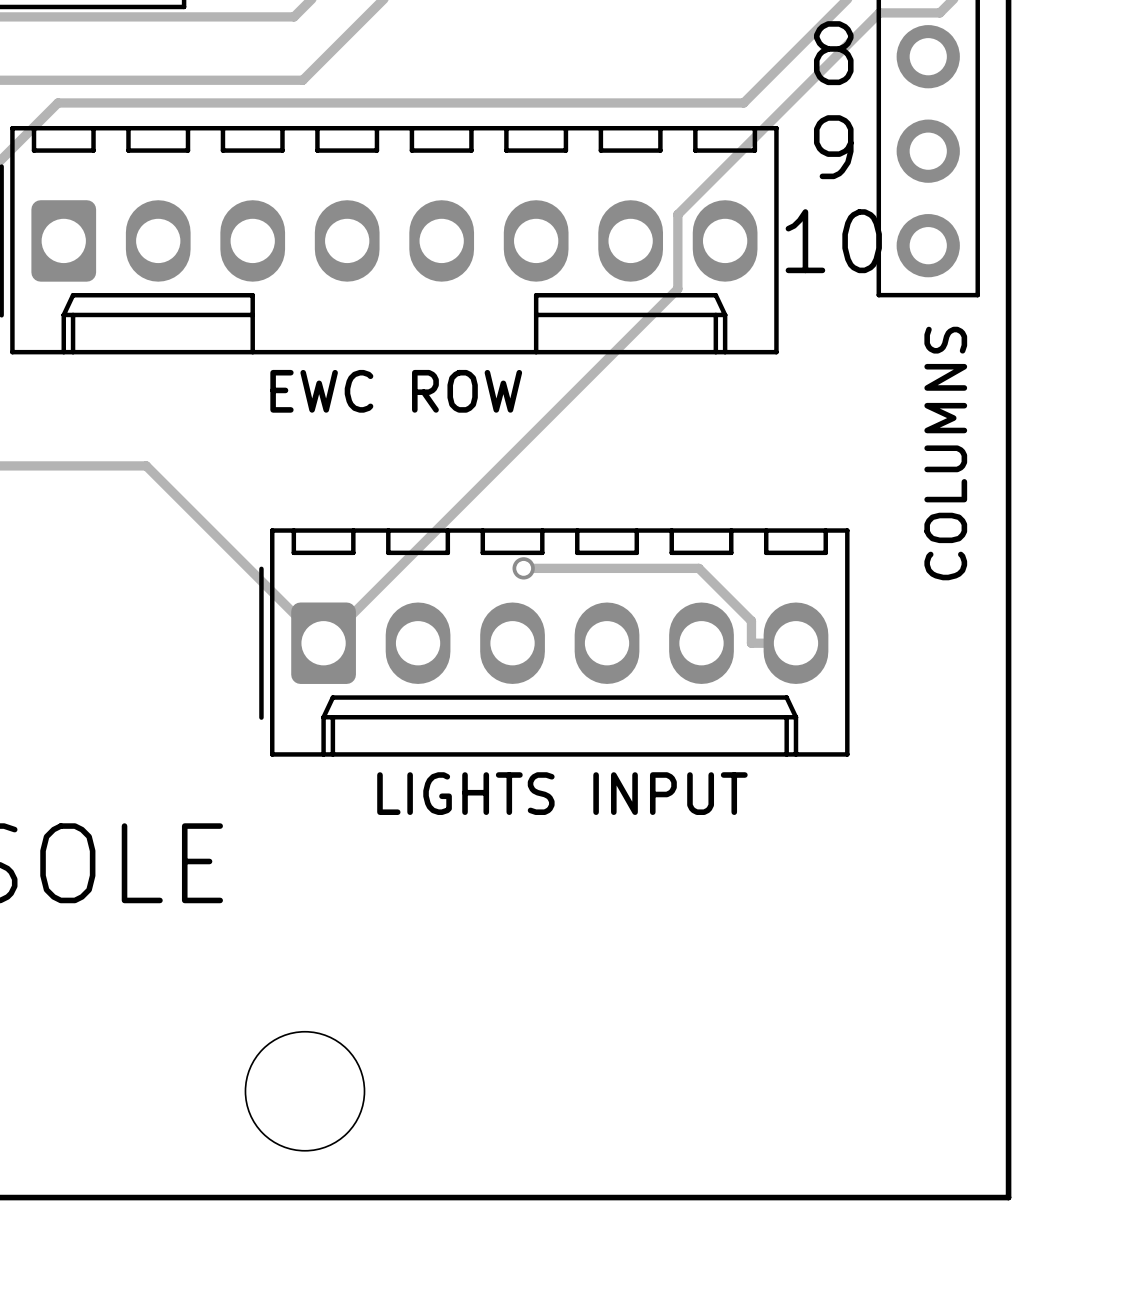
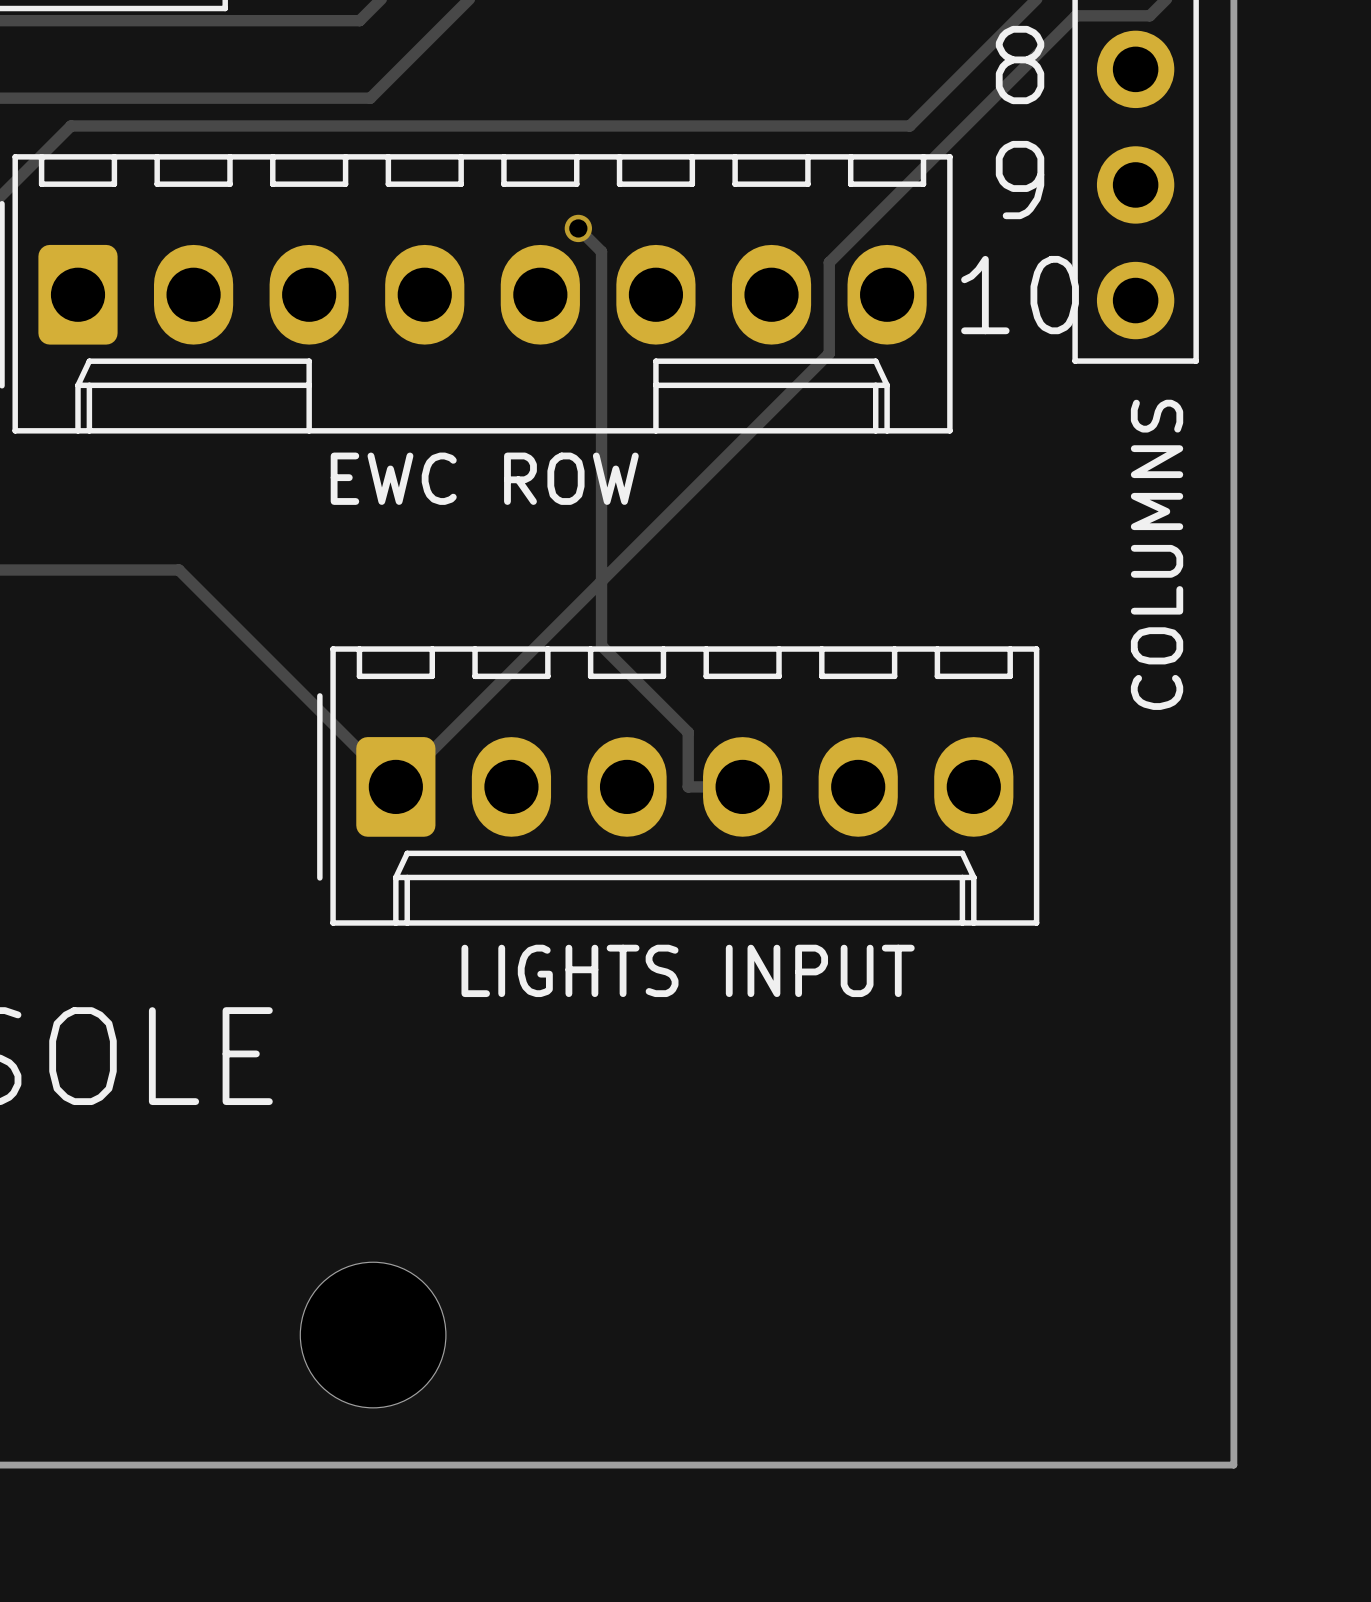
track: none -> (578, 228) (601, 251) (601, 645) (688, 732) (688, 786) (742, 786)
via: none -> (578, 228)
track: (523, 568) (698, 568) (751, 620) (751, 643) (795, 643) -> none
via: (523, 568) -> none

